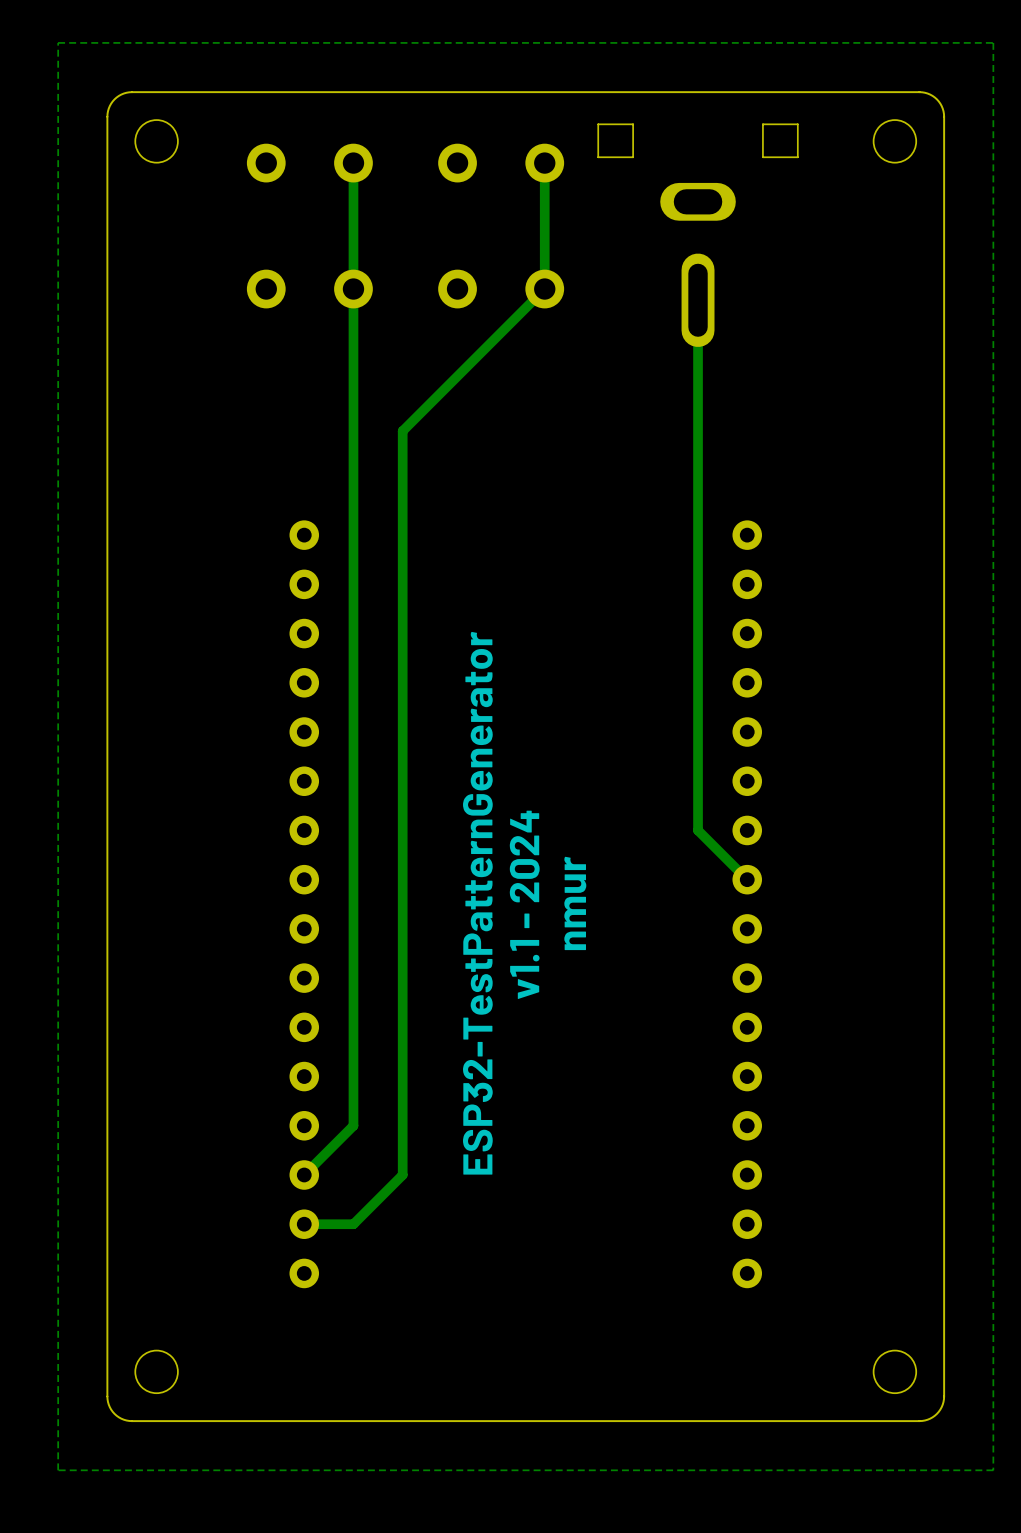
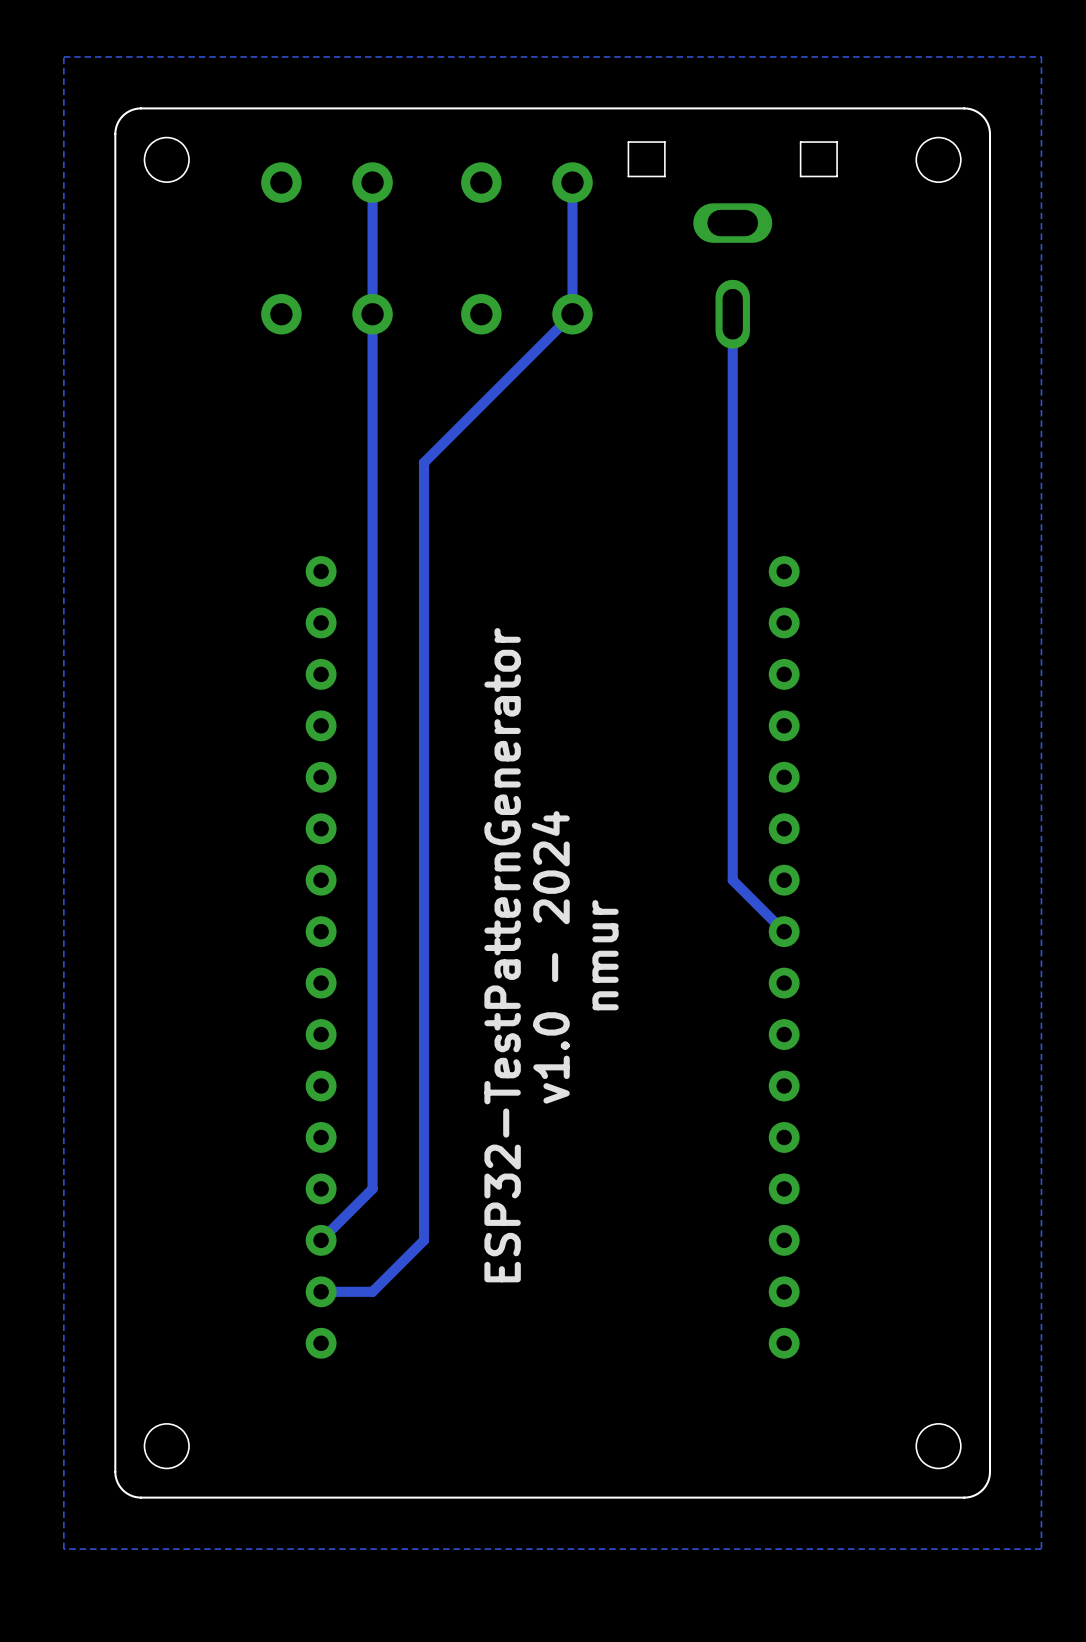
part footprint: [598, 124, 798, 347] -> [628, 141, 838, 349]
text: v1.1 - 2024 (524, 904) -> v1.0 - 2024 (550, 957)

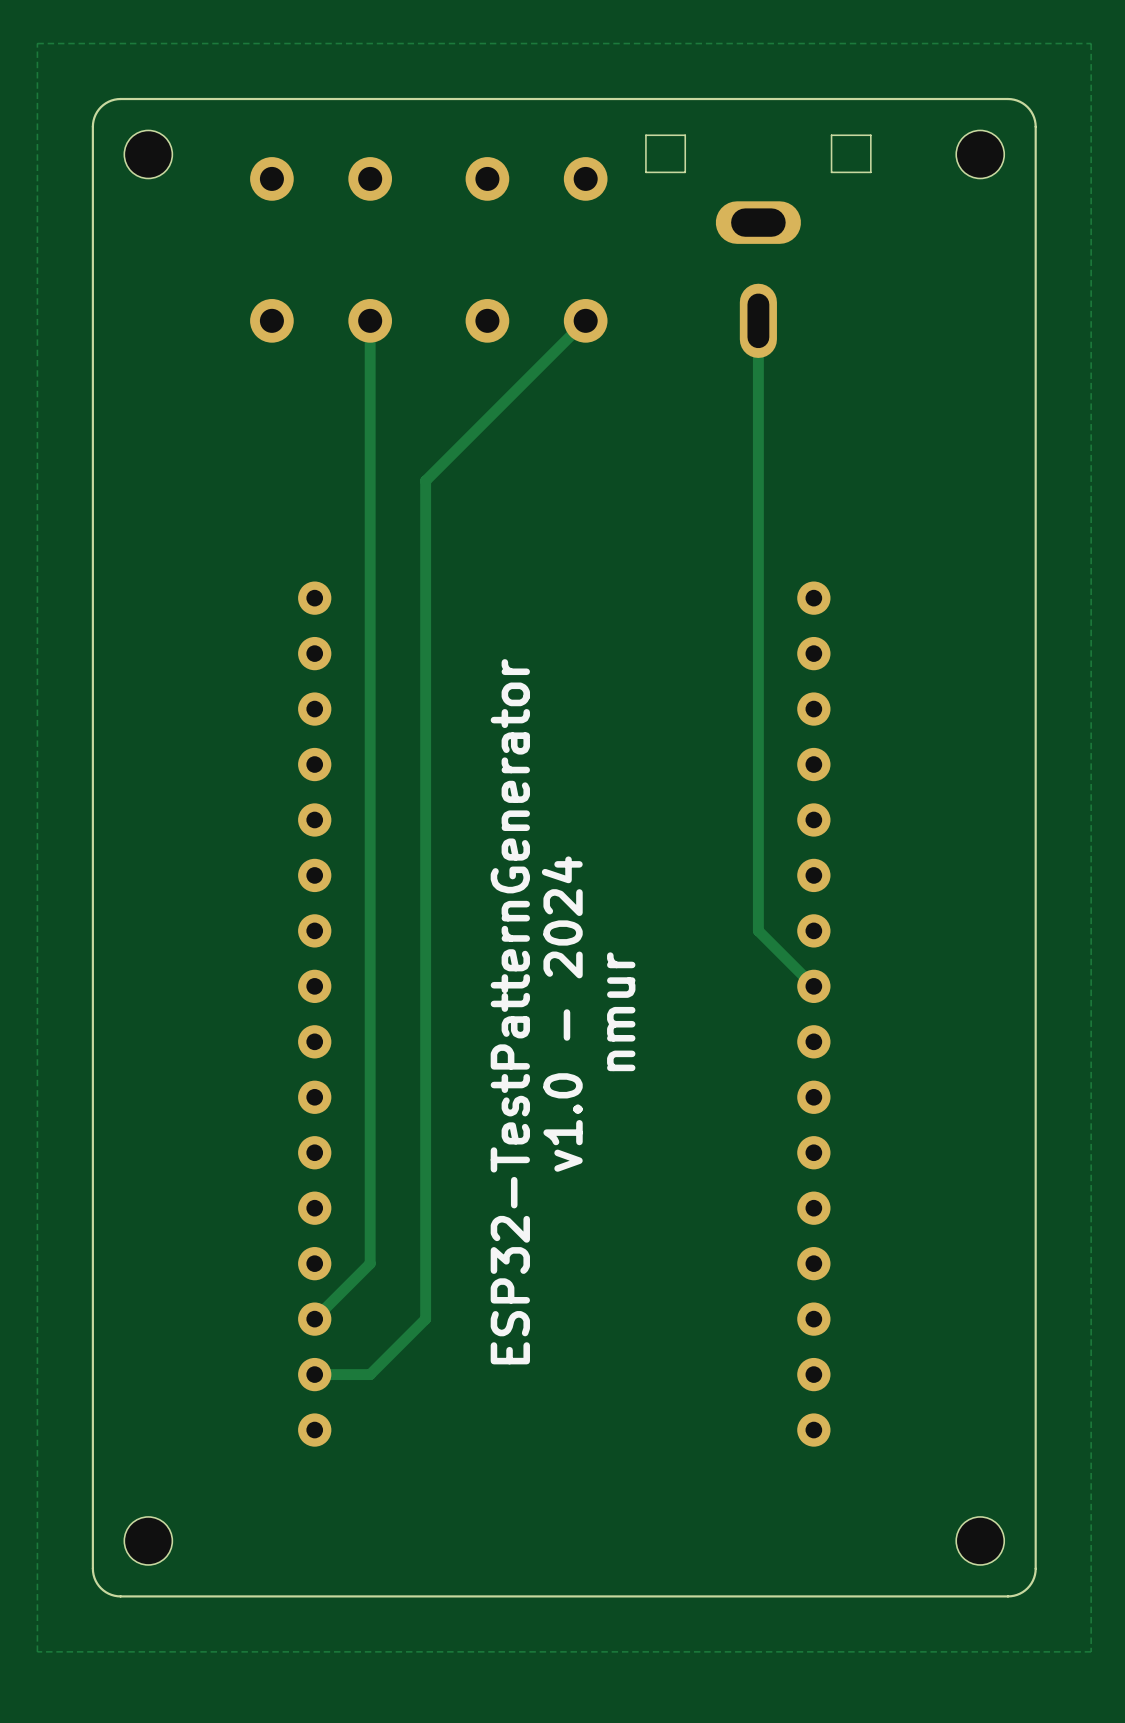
track: (372, 182) (372, 314) -> none
track: (572, 182) (572, 314) -> none

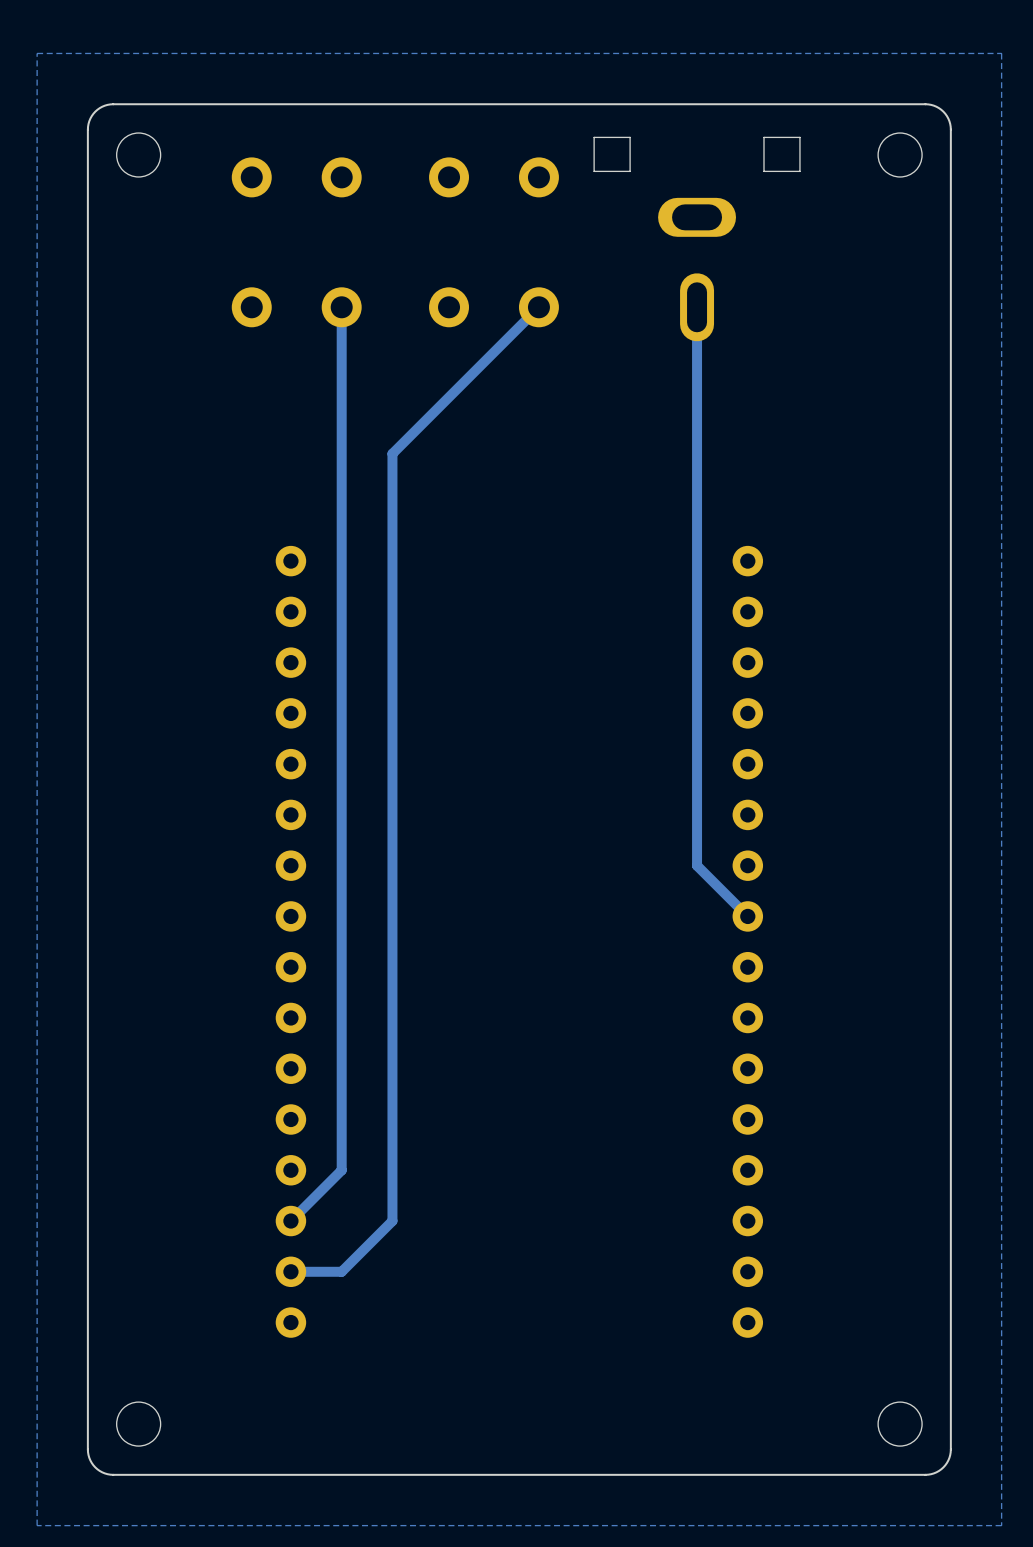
text: ESP32-TestPatternGenerator (510, 1011) -> none
text: nmur (621, 1011) -> none
text: v1.0 - 2024 (562, 1014) -> none

